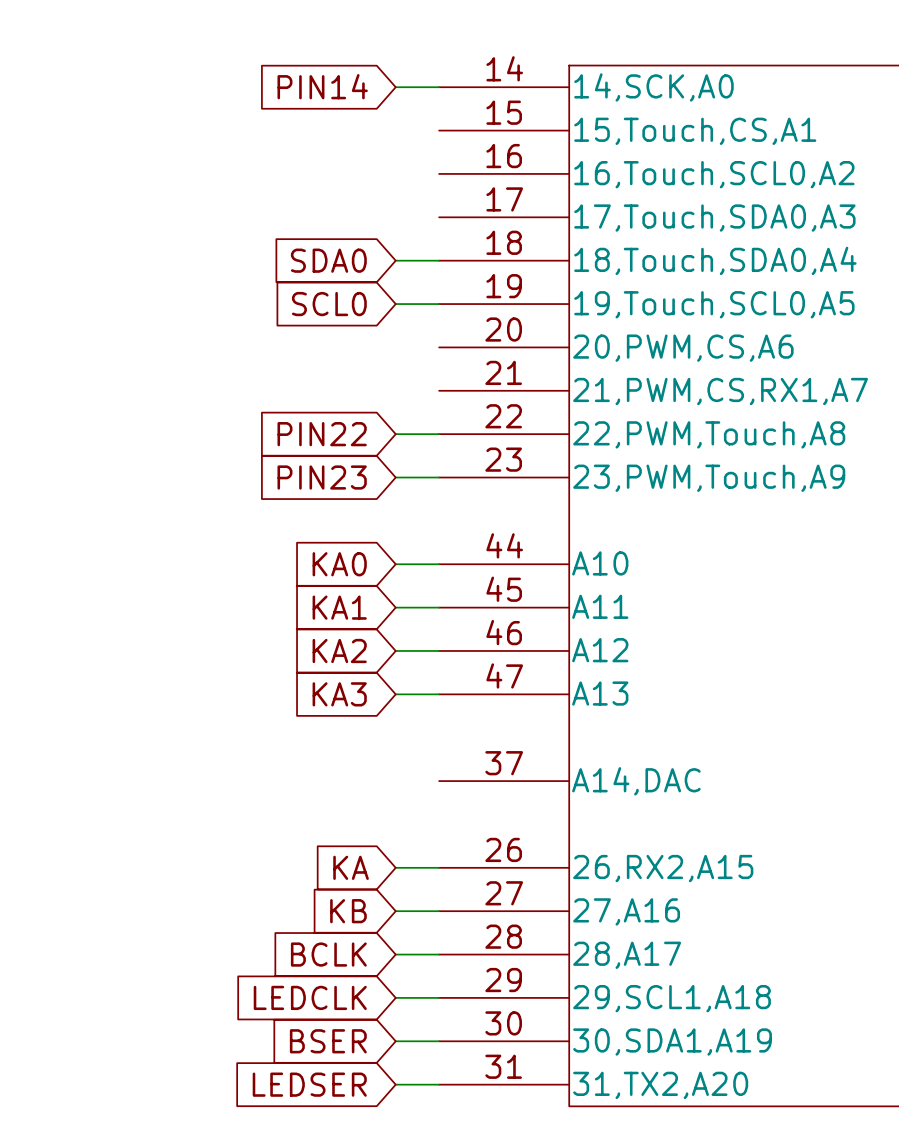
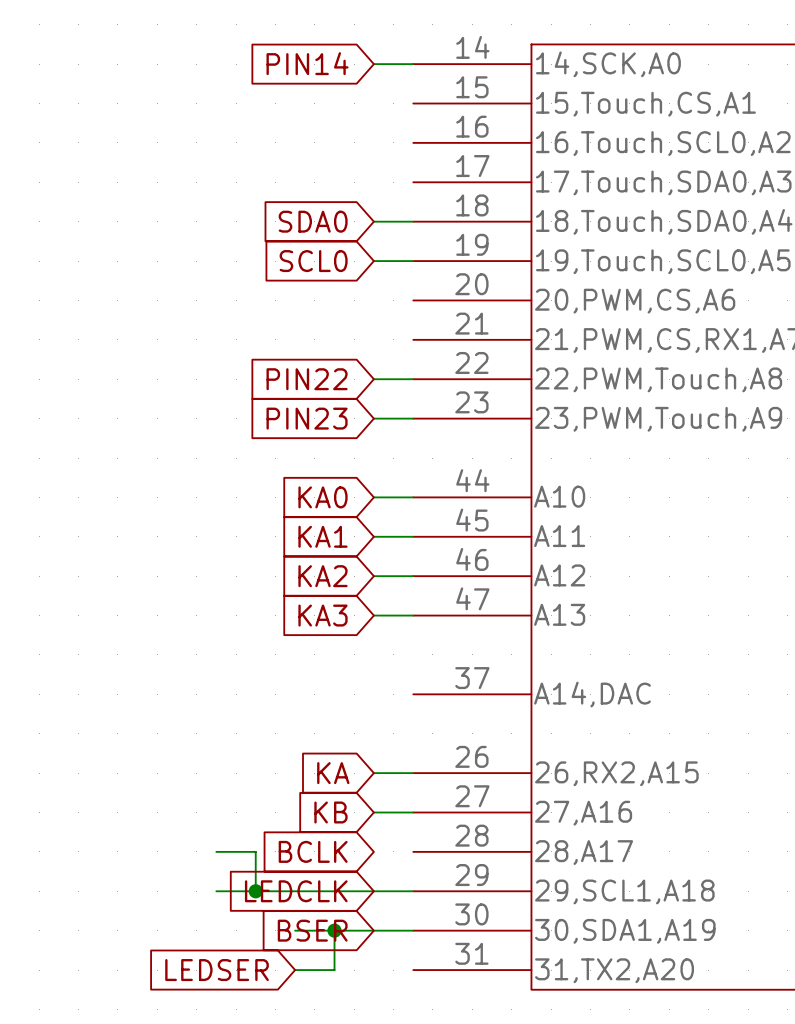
wire: none -> (216, 851) (255, 851) (255, 891)
wire: (395, 954) (439, 954) -> none
wire: none -> (216, 891) (373, 891)
junction: none -> (255, 891)
wire: none -> (295, 930) (373, 930)
wire: none -> (334, 930) (334, 970) (295, 970)
junction: none -> (334, 930)
global label position: LEDSER (309, 1084) -> LEDSER (217, 970)
wire: (395, 1084) (439, 1084) -> none

